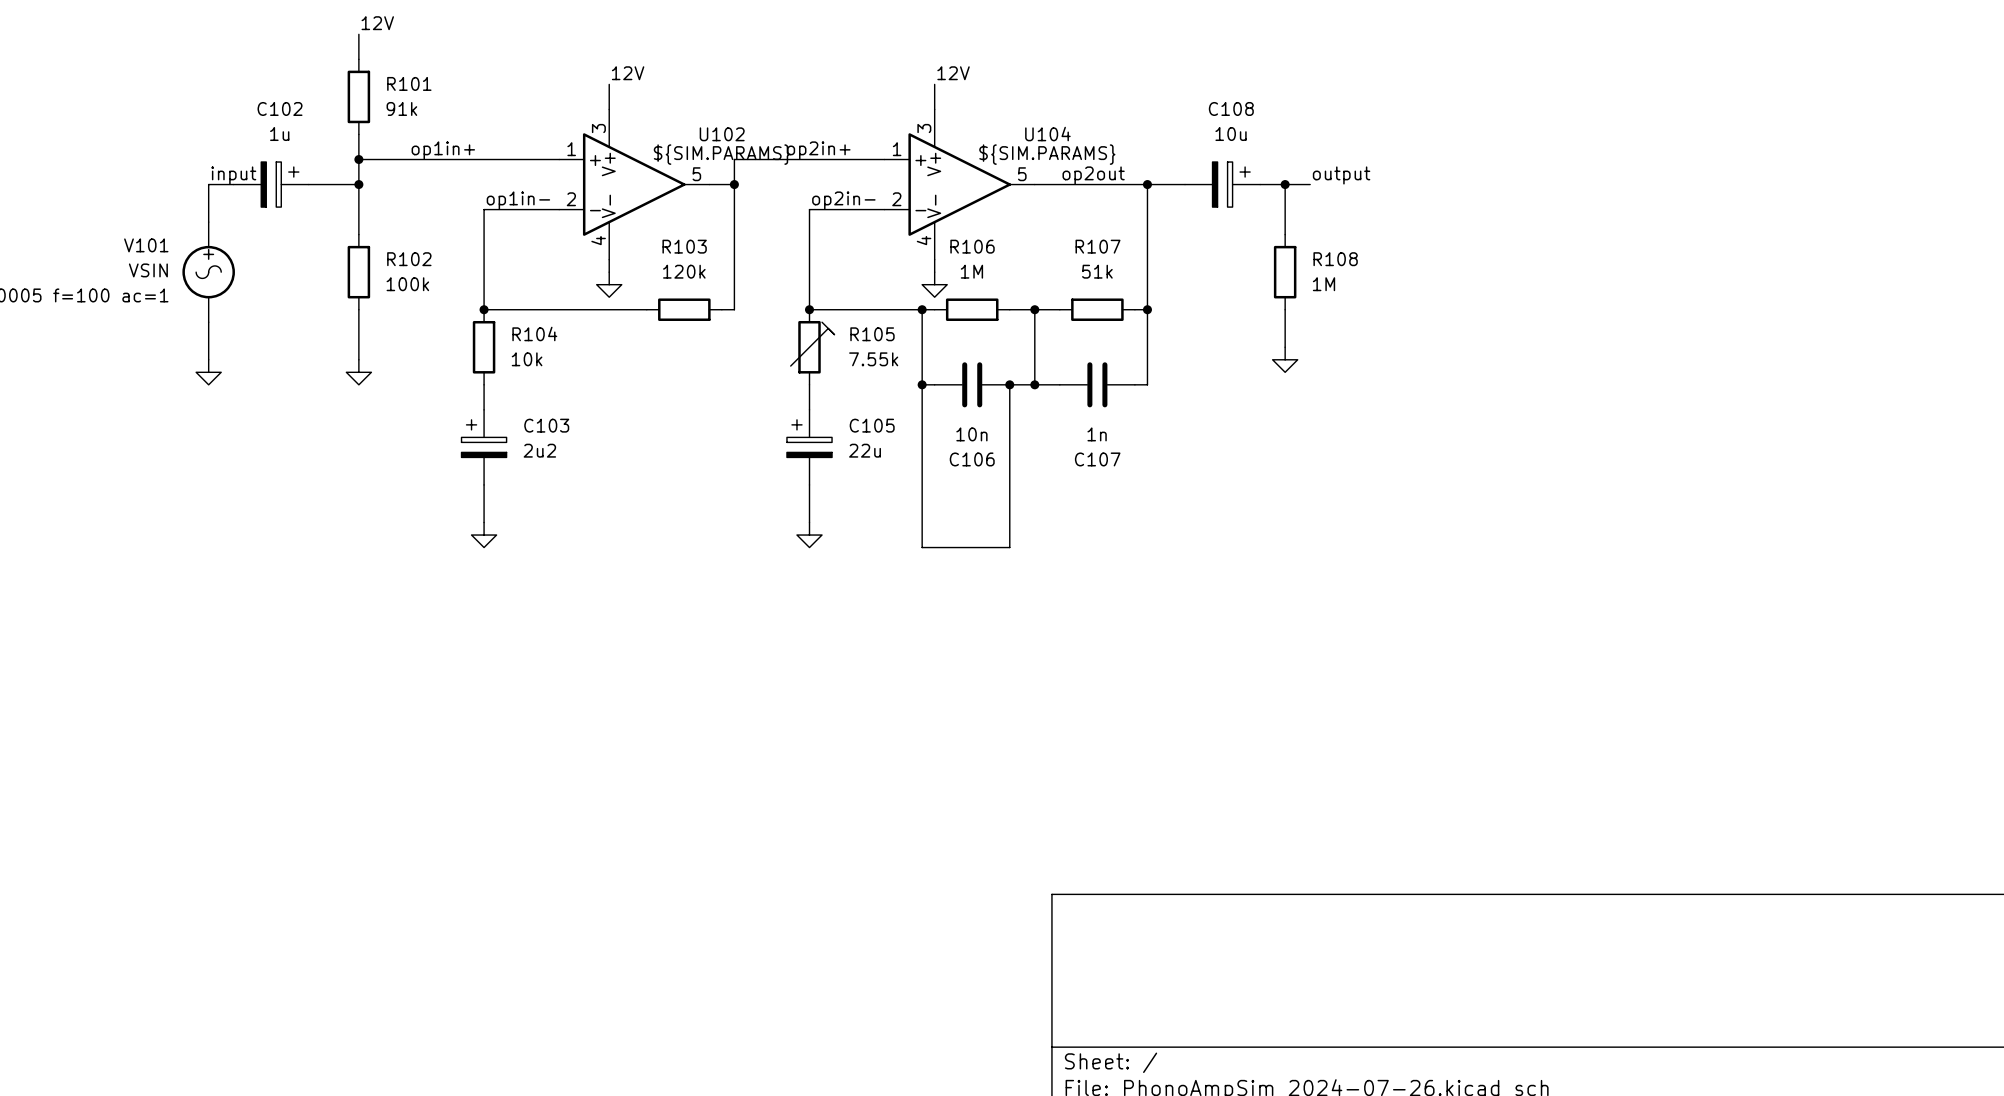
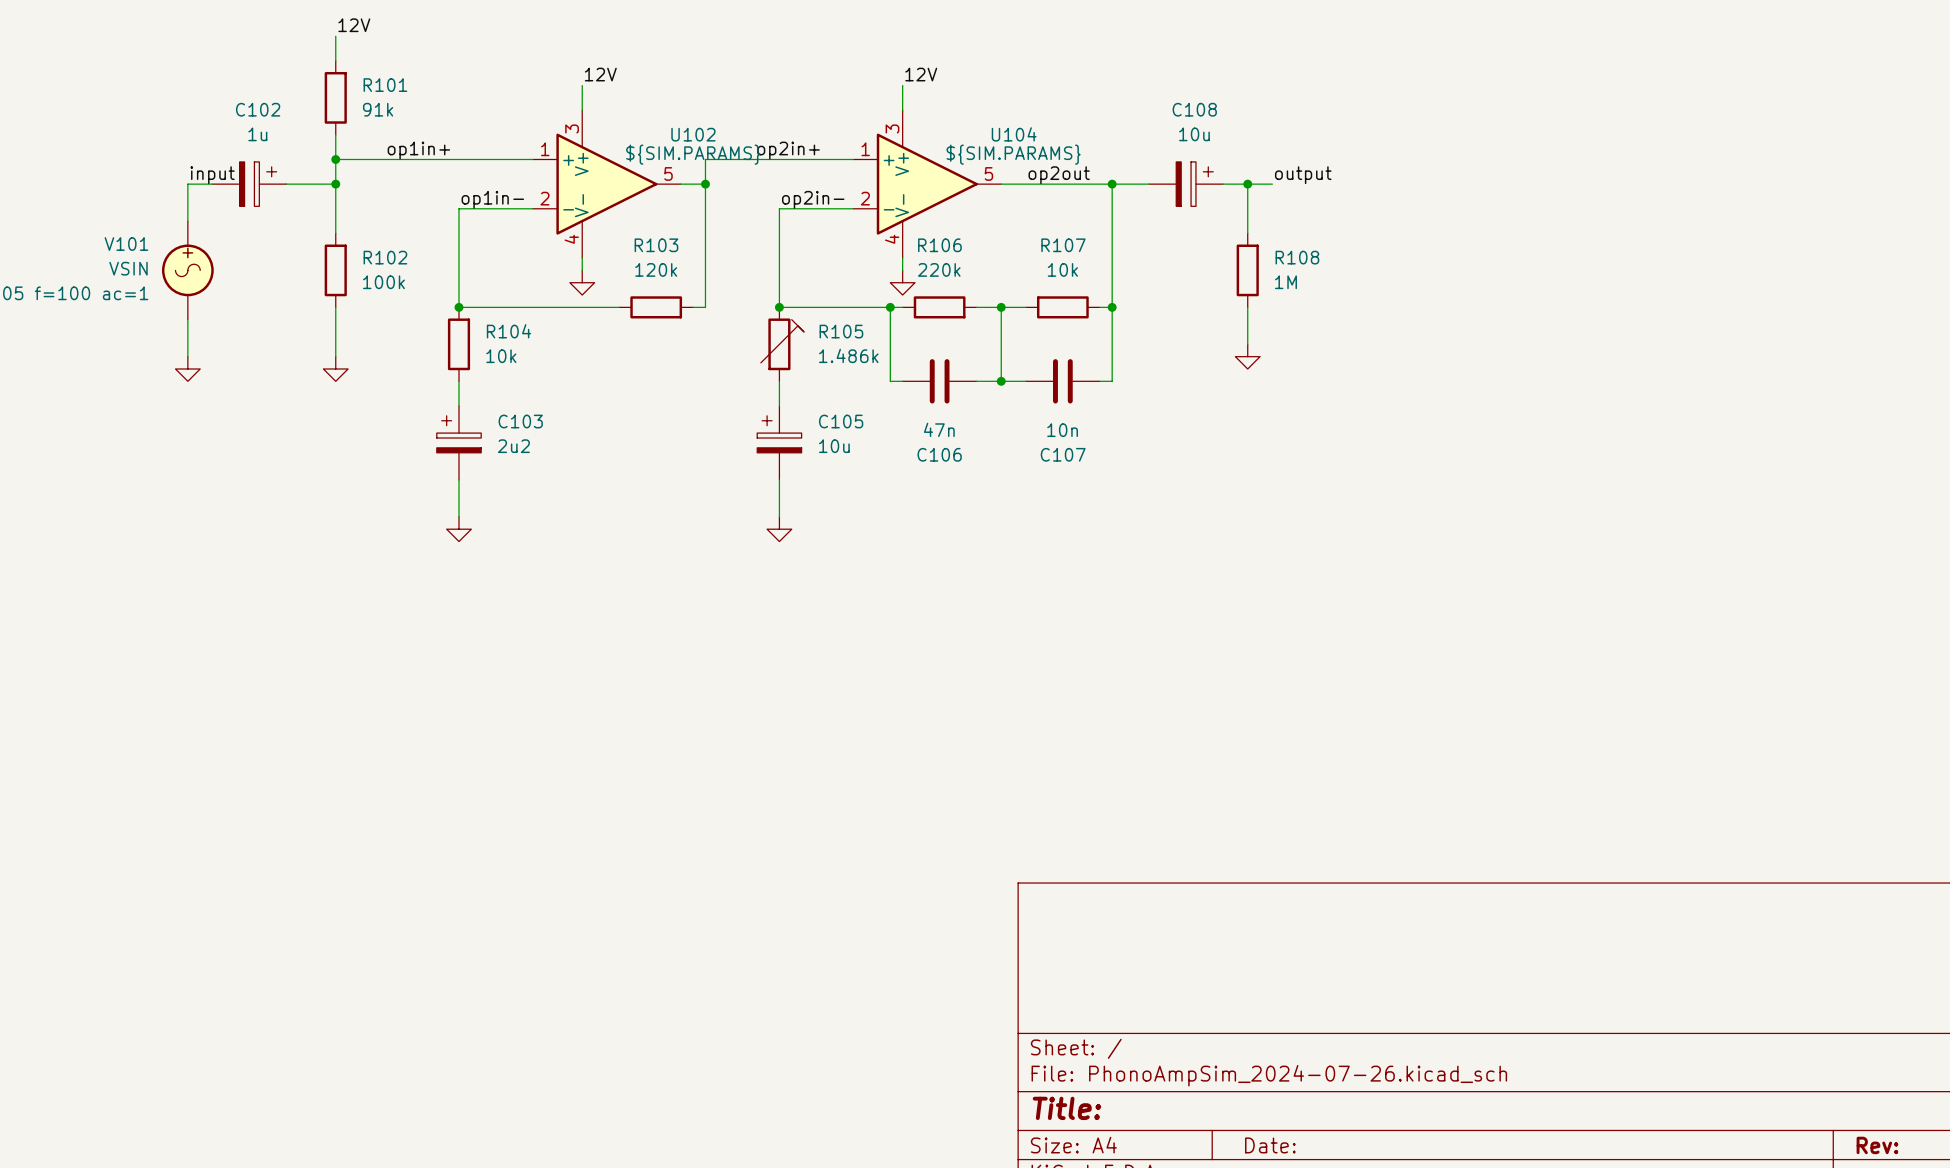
R106 value: 1M (971, 271) -> 220k (939, 269)
R107 value: 51k (1097, 271) -> 10k (1062, 269)
R105 value: 7.55k (873, 359) -> 1.486k (848, 355)
wire: (922, 384) (922, 547) (1009, 547) (1009, 384) -> none
junction: (922, 384) -> none
junction: (1009, 384) -> none
C106 value: 10n (971, 434) -> 47n (939, 429)
C107 value: 1n (1097, 434) -> 10n (1062, 430)
C105 value: 22u (865, 450) -> 10u (834, 446)

